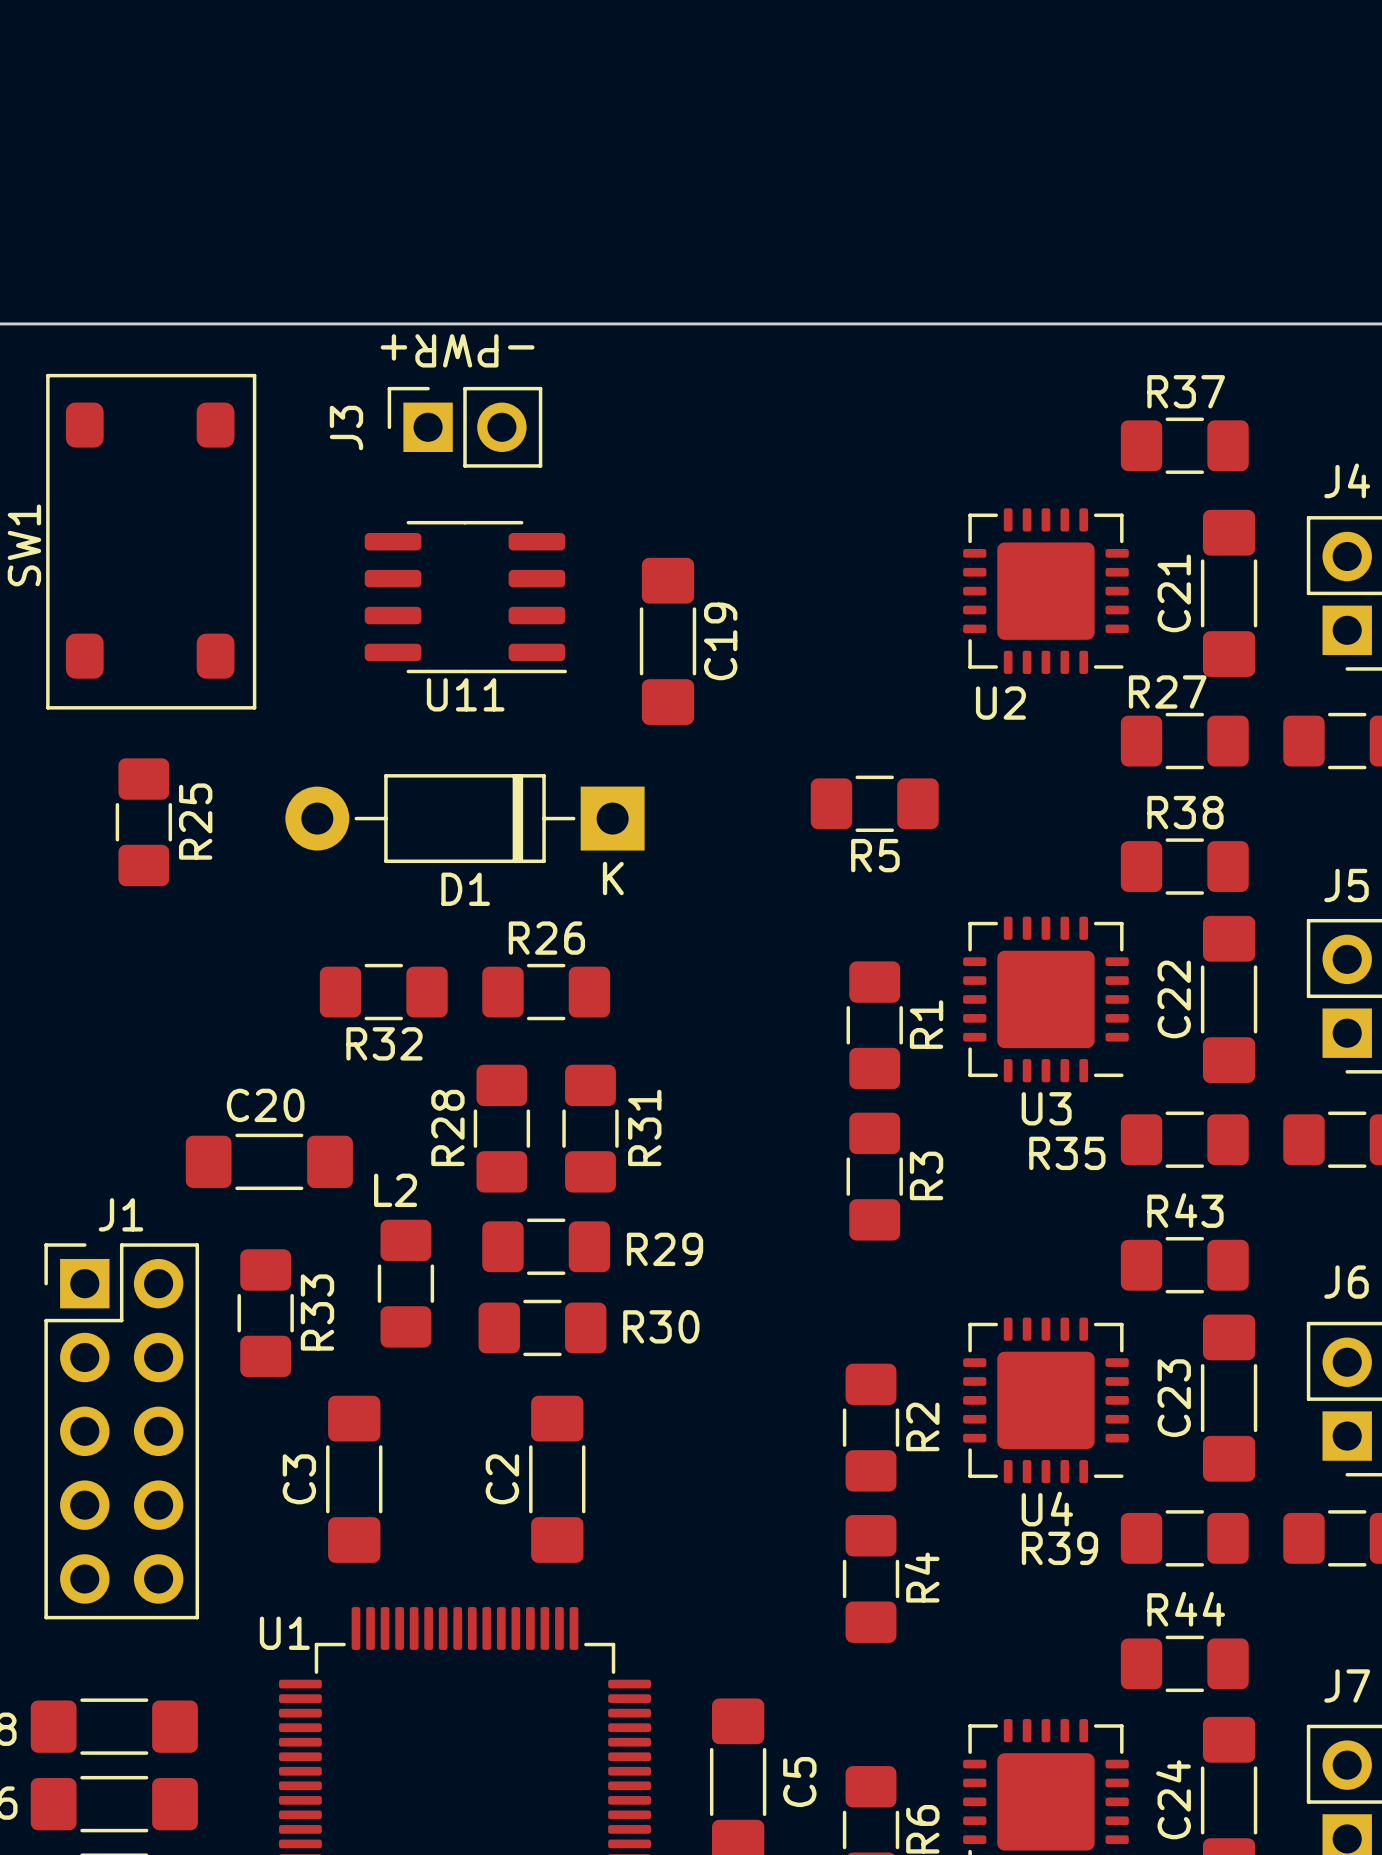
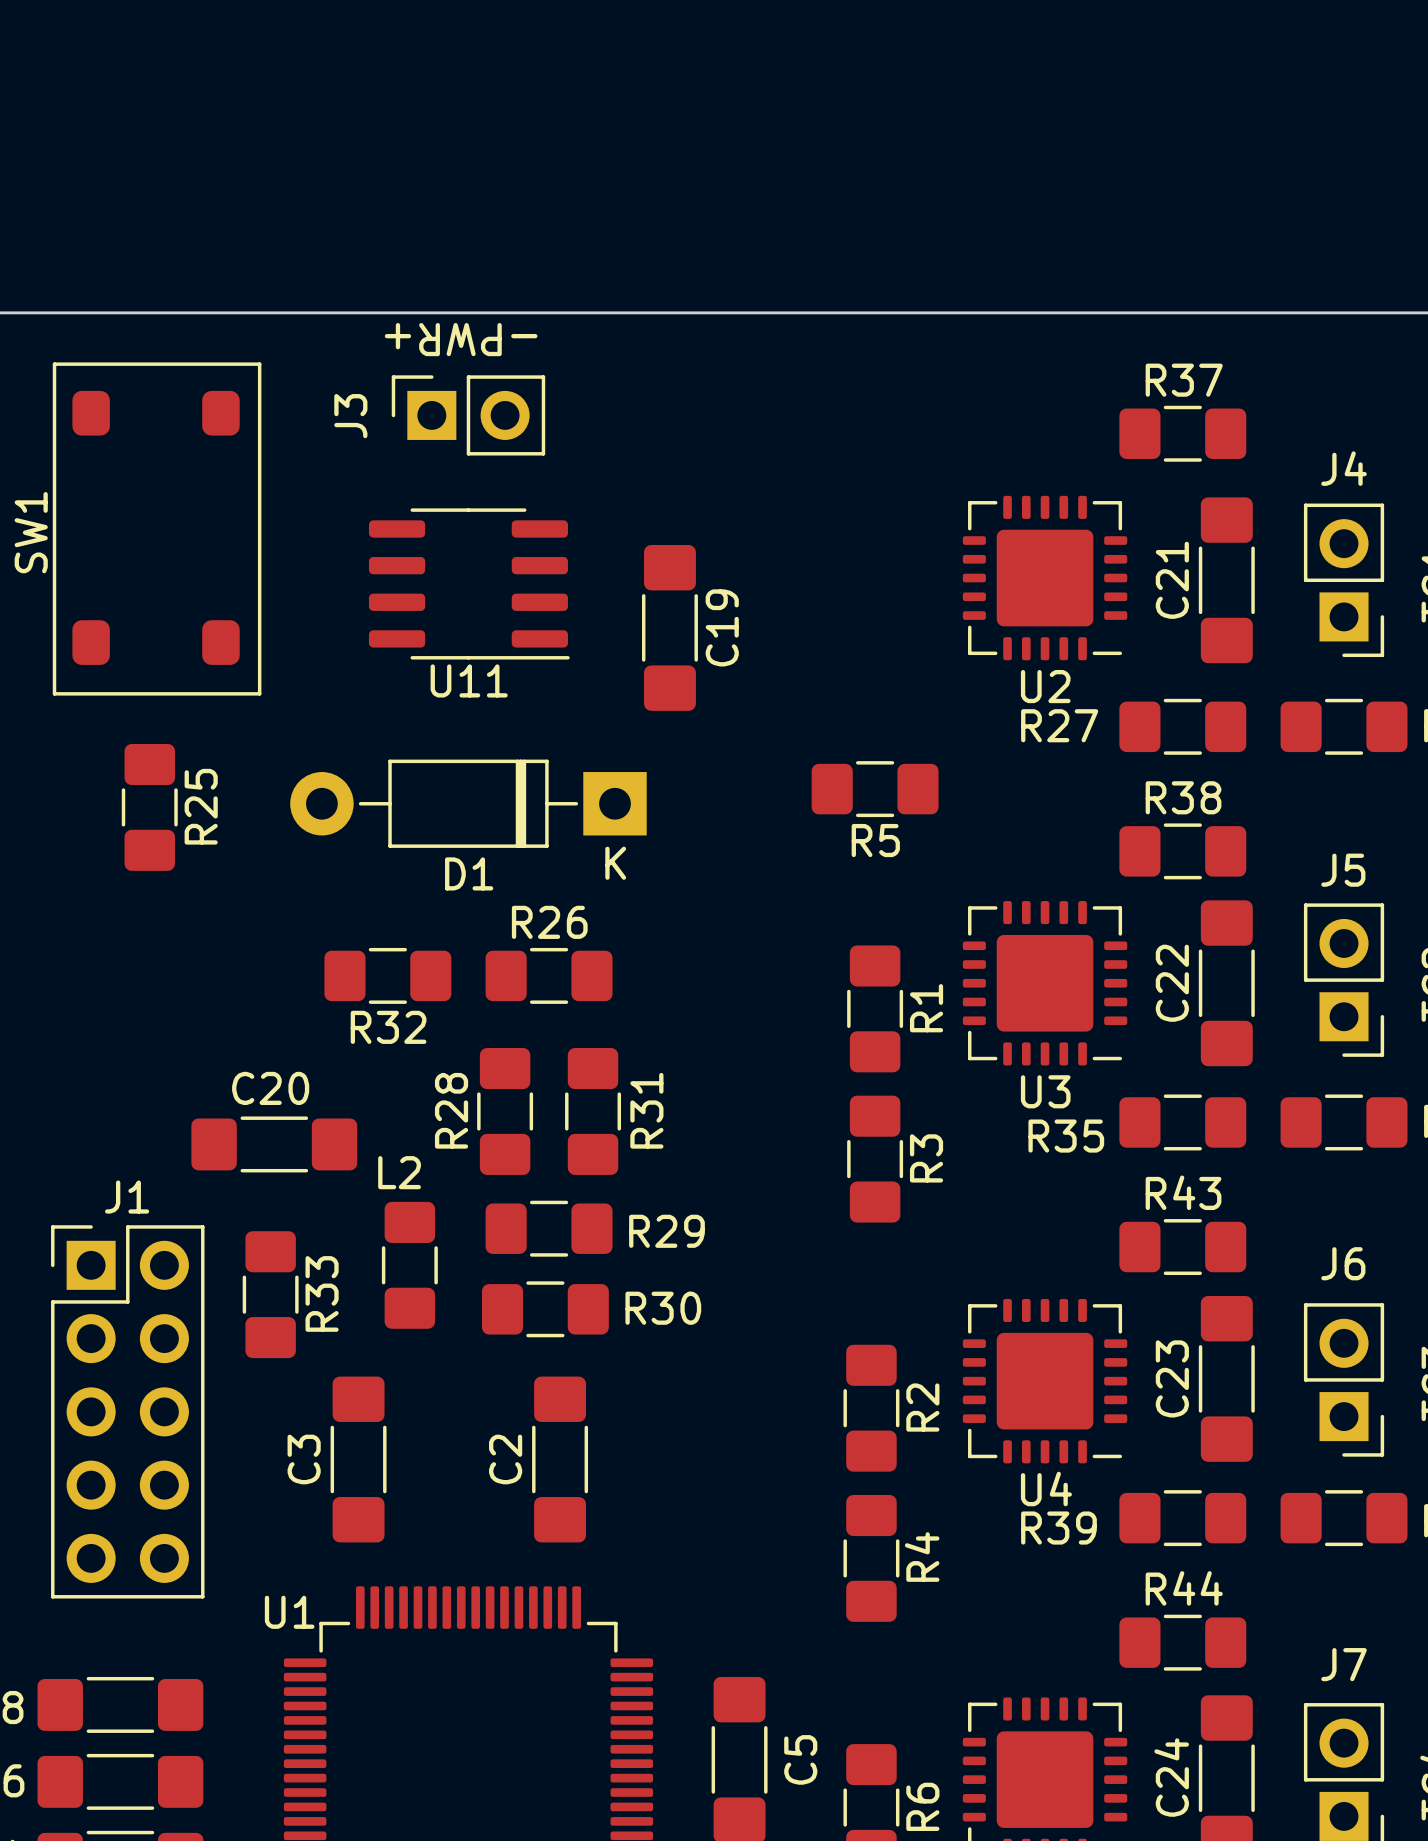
R27 name position: R27 (1167, 691) -> R27 (1059, 725)
U2 name position: U2 (1000, 703) -> U2 (1045, 686)

